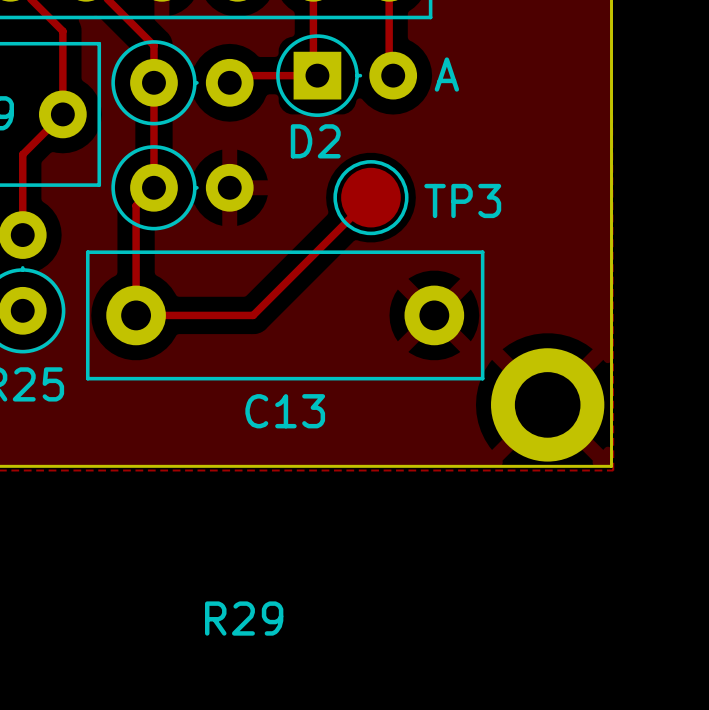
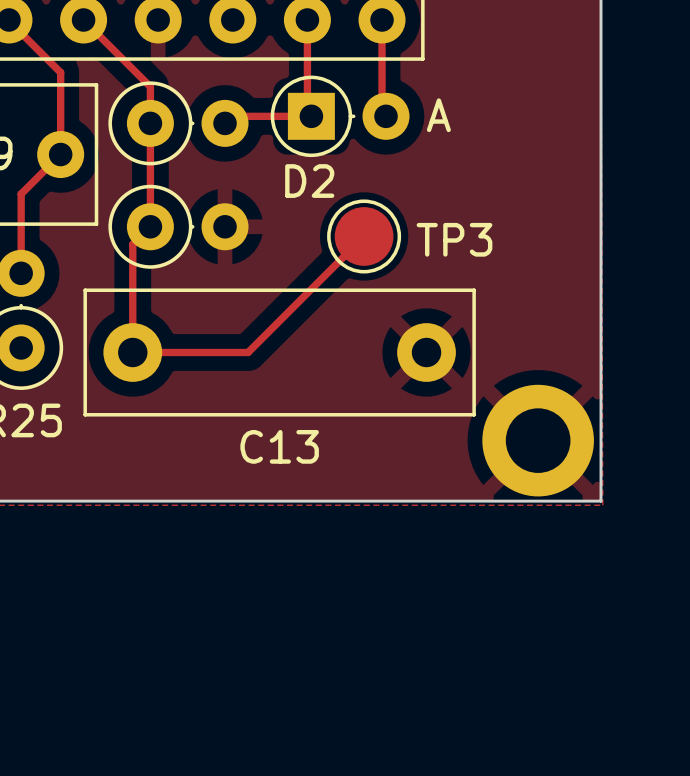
R29 name: R29 (244, 618) -> none

